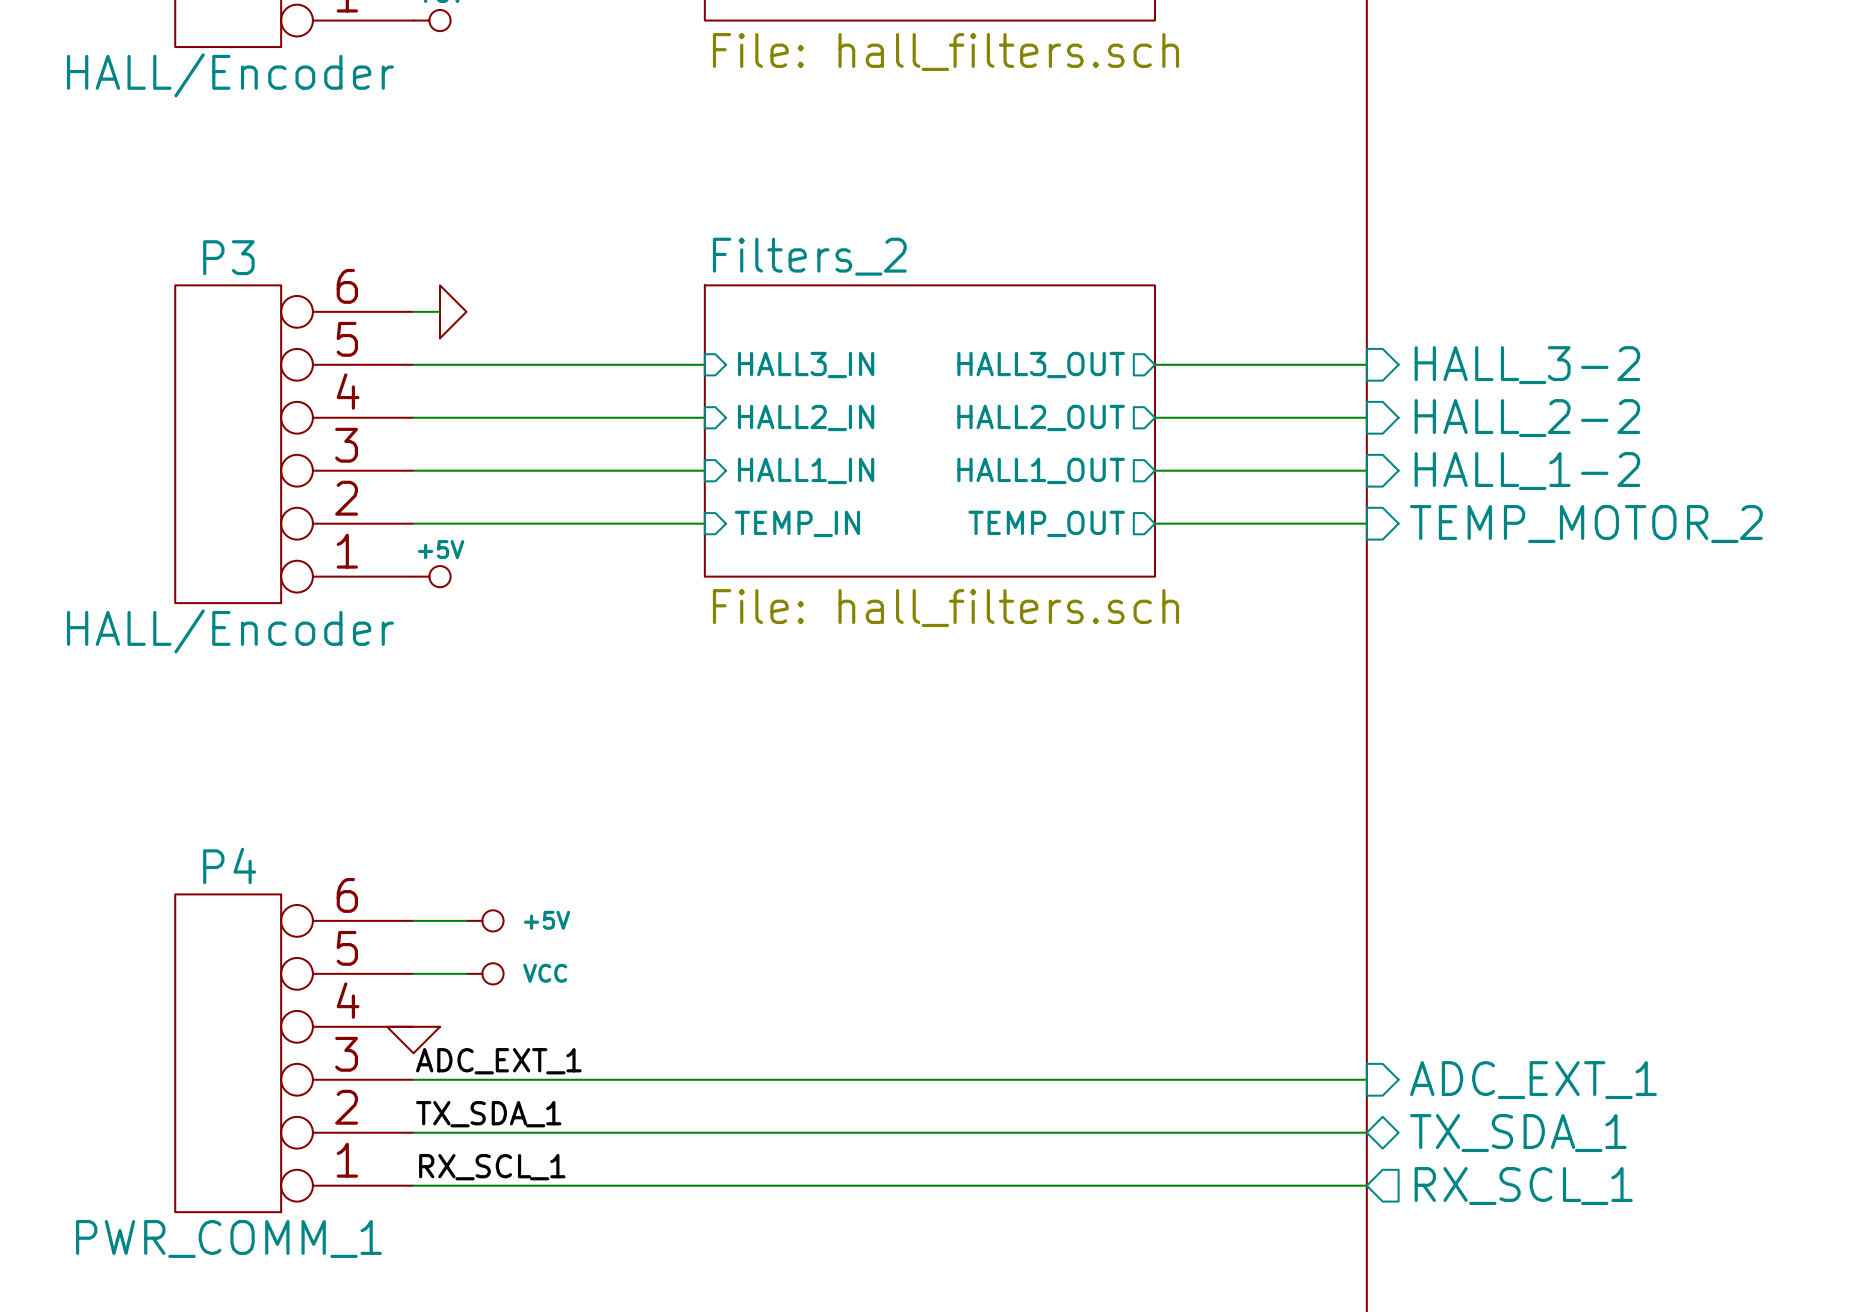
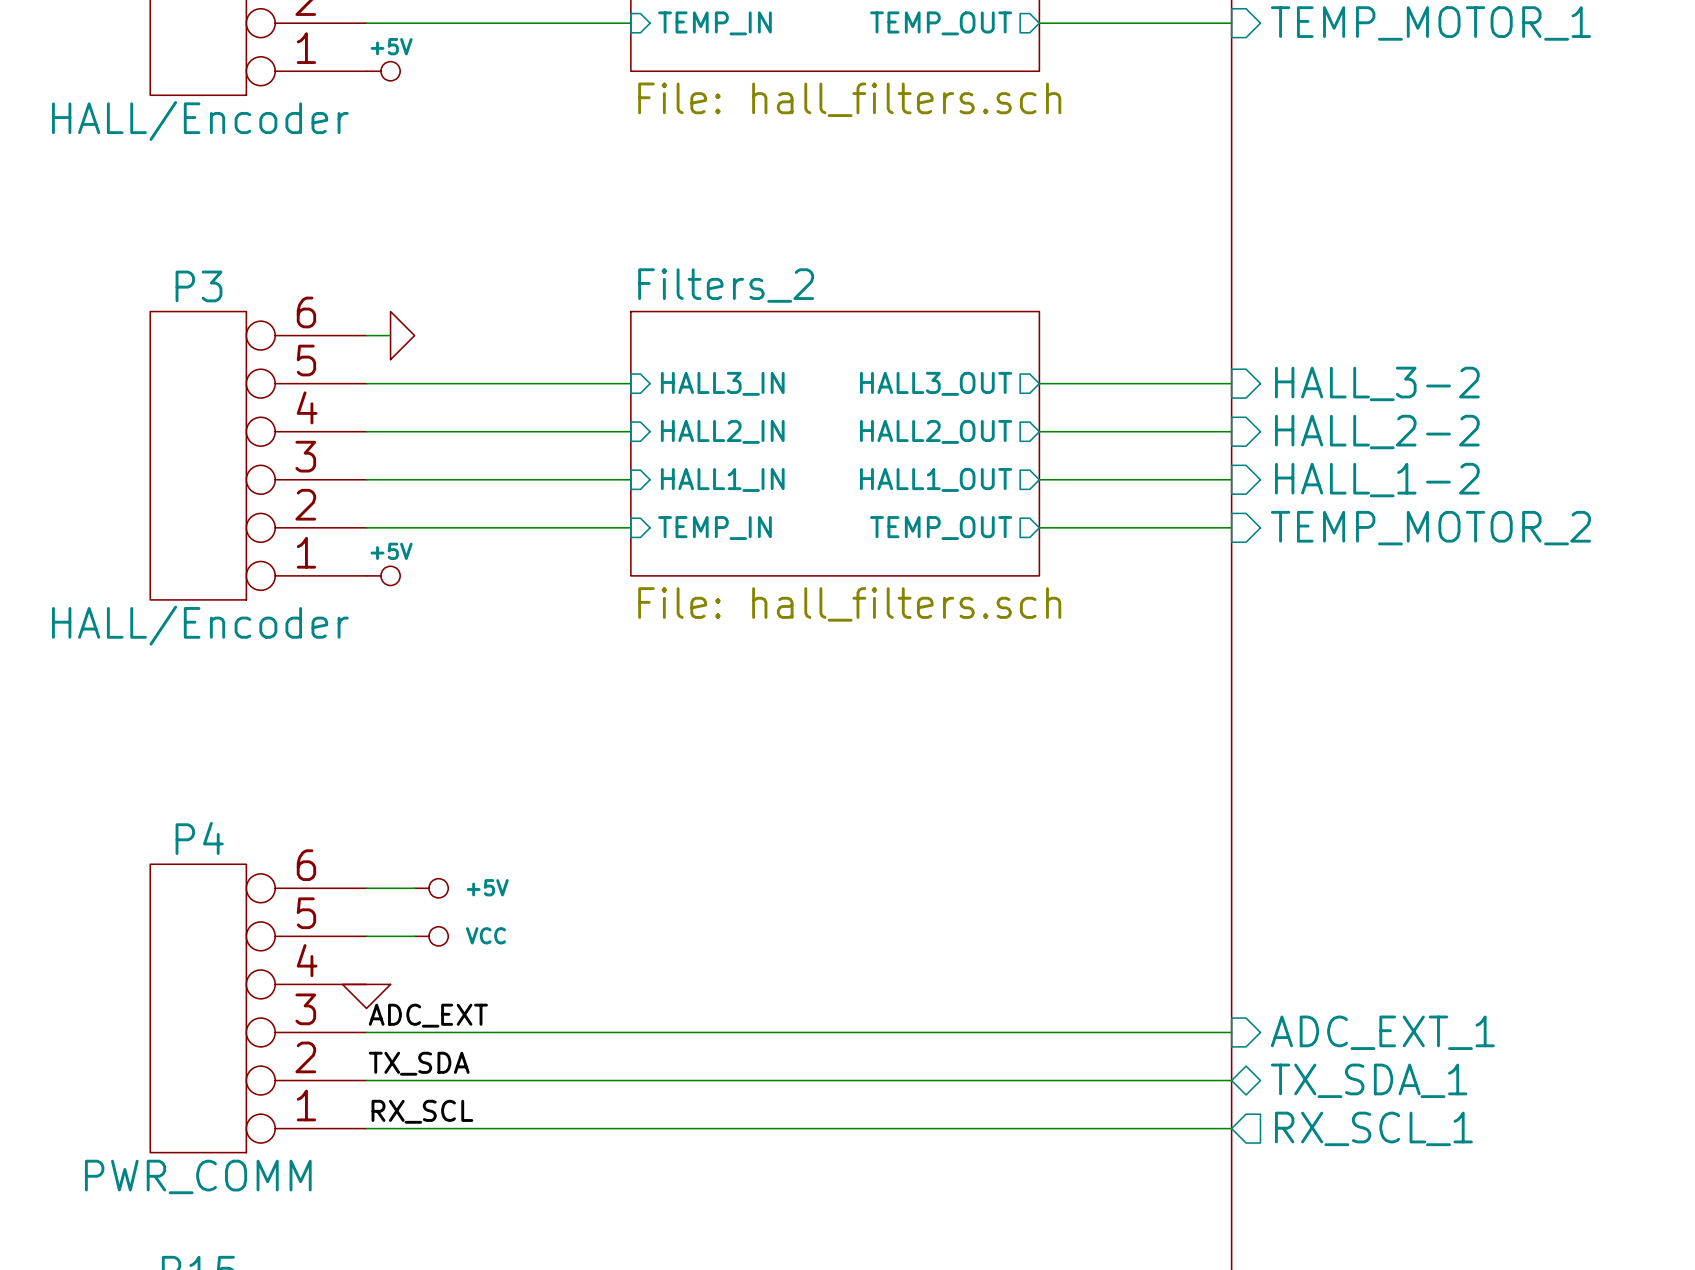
label: ADC_EXT_1 (498, 1061) -> ADC_EXT (428, 1015)
label: TX_SDA_1 (488, 1114) -> TX_SDA (419, 1063)
label: RX_SCL_1 (492, 1167) -> RX_SCL (422, 1111)
P4 value: PWR_COMM_1 (228, 1238) -> PWR_COMM (198, 1176)

